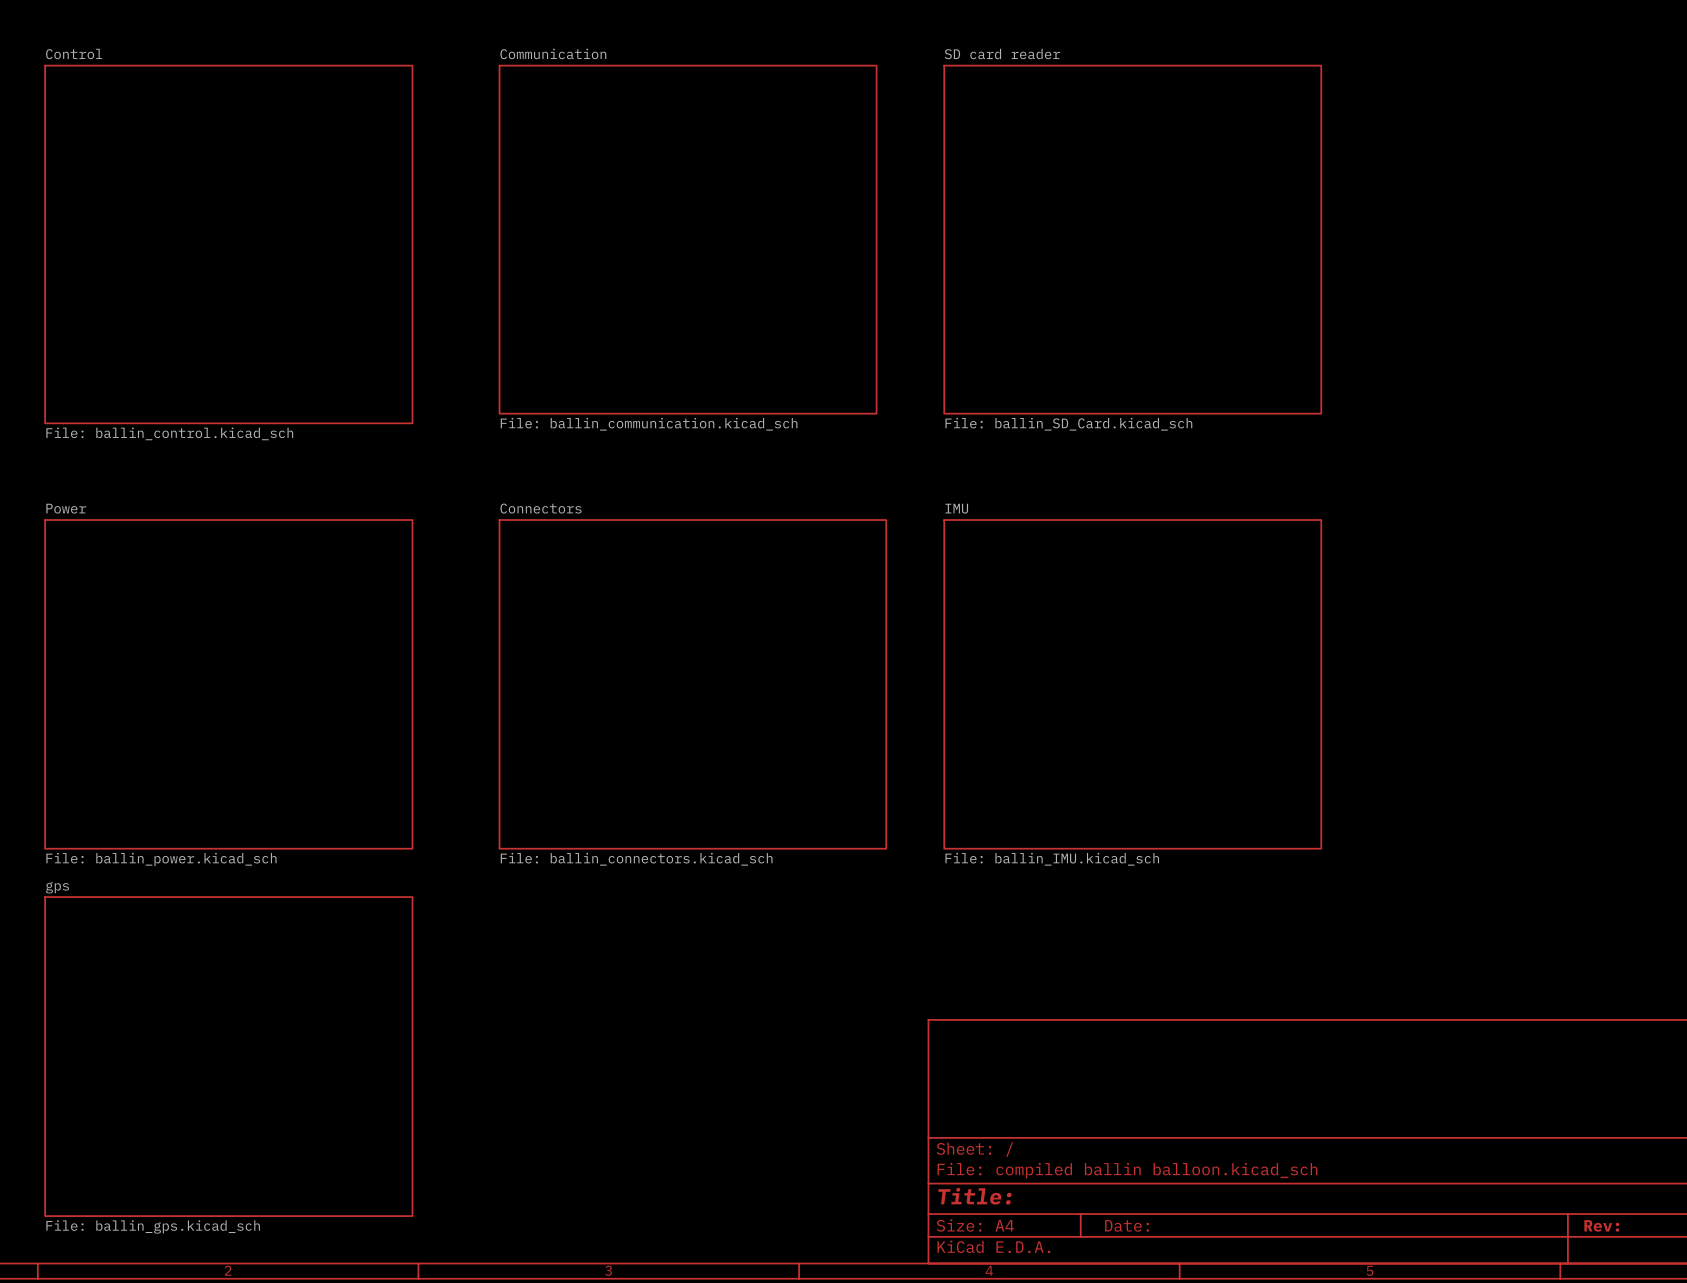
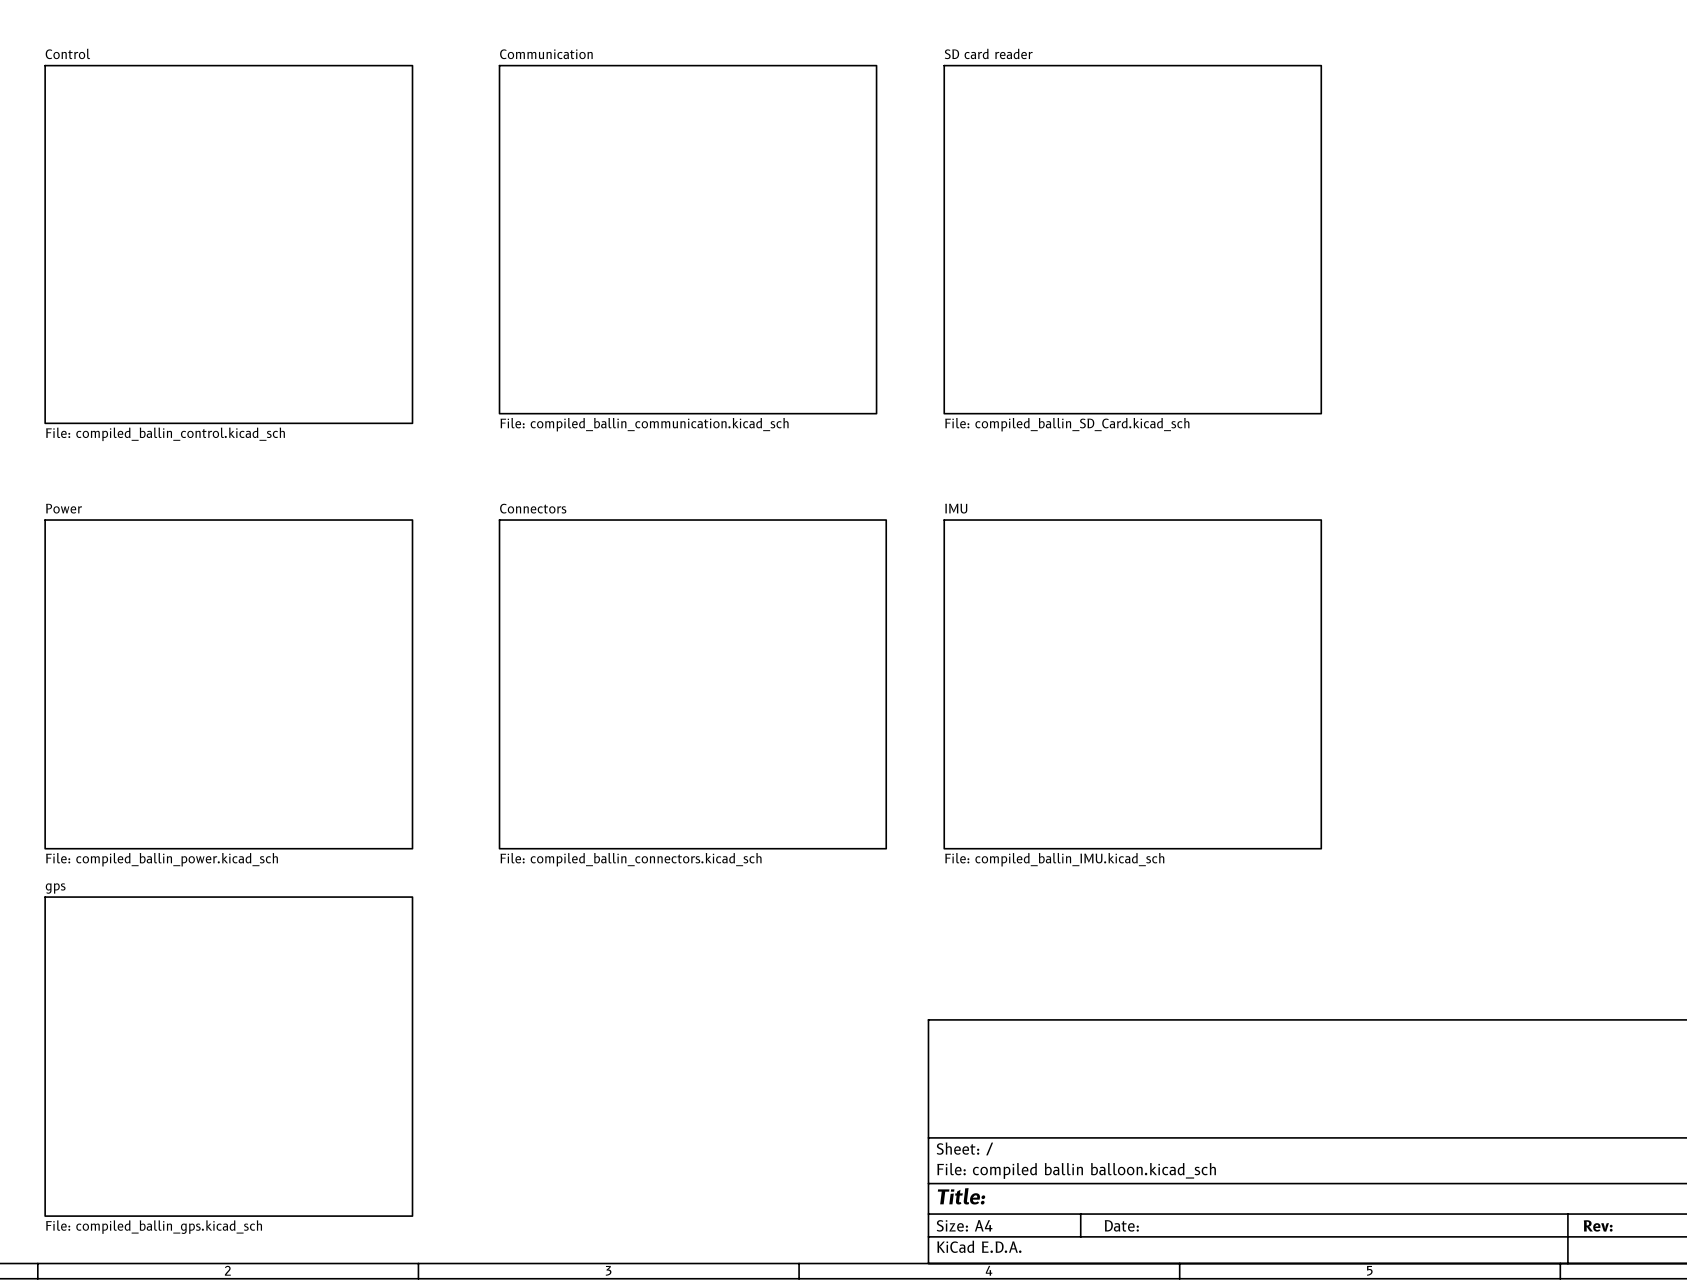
sheet Communication value: File: ballin_communication.kicad_sch (649, 424) -> File: compiled_ballin_communication.kicad_sch (644, 424)
sheet SD card reader value: File: ballin_SD_Card.kicad_sch (1068, 424) -> File: compiled_ballin_SD_Card.kicad_sch (1067, 424)
sheet Control value: File: ballin_control.kicad_sch (169, 433) -> File: compiled_ballin_control.kicad_sch (165, 434)
sheet Power value: File: ballin_power.kicad_sch (161, 859) -> File: compiled_ballin_power.kicad_sch (162, 859)
sheet Connectors value: File: ballin_connectors.kicad_sch (636, 859) -> File: compiled_ballin_connectors.kicad_sch (631, 859)
sheet IMU value: File: ballin_IMU.kicad_sch (1052, 859) -> File: compiled_ballin_IMU.kicad_sch (1054, 859)
sheet gps value: File: ballin_gps.kicad_sch (153, 1226) -> File: compiled_ballin_gps.kicad_sch (154, 1227)

